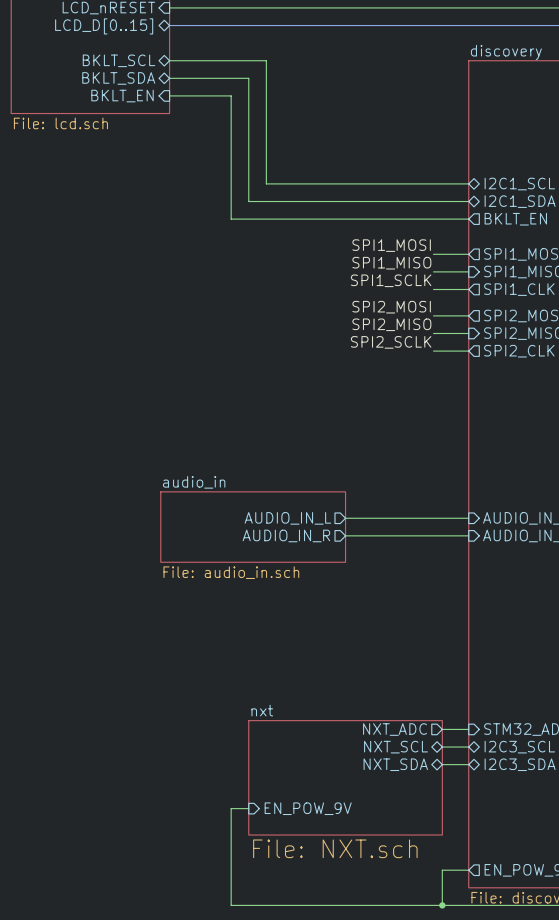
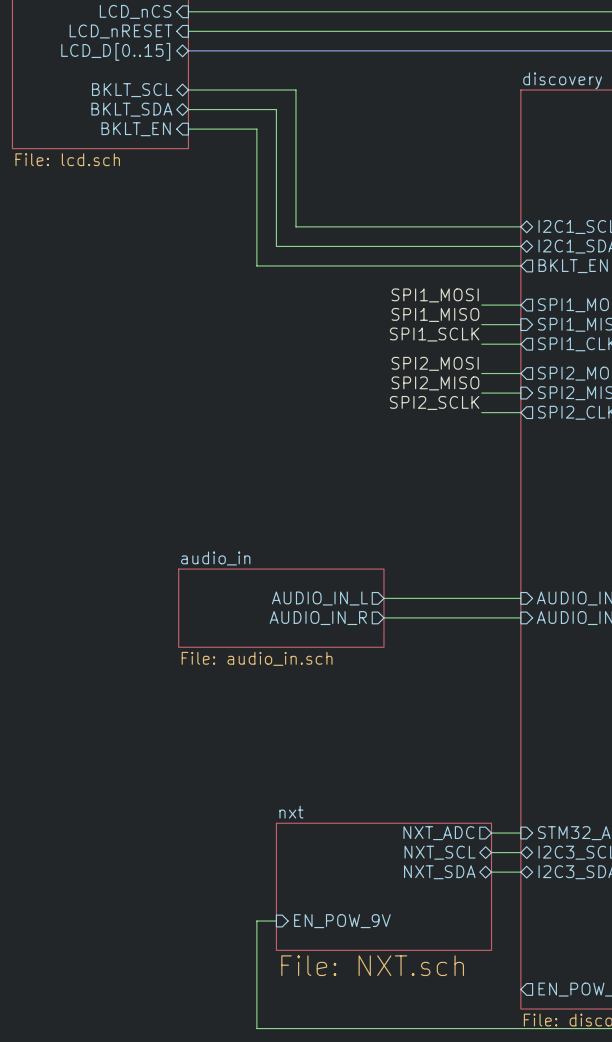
wire: (468, 870) (442, 870) (442, 905) -> none
junction: (442, 905) -> none

